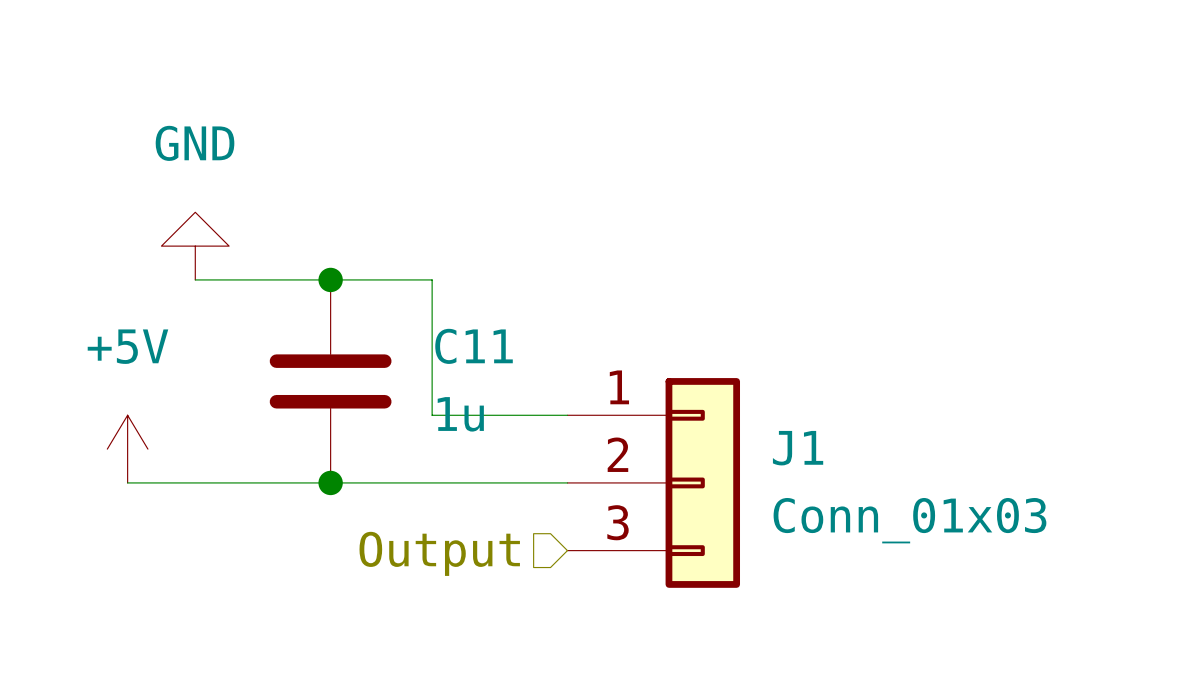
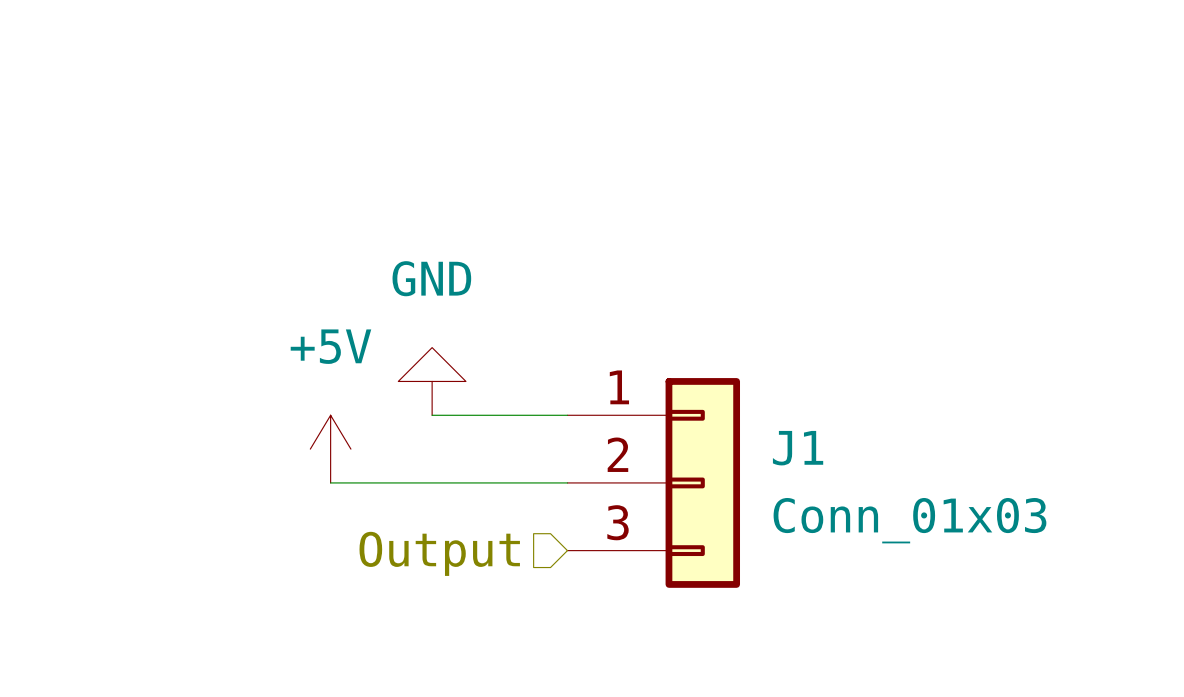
power symbol position: GND (195, 246) -> GND (432, 381)
wire: (195, 279) (432, 279) (432, 415) -> none
junction: (330, 279) -> none
C11: 1u (330, 381) -> none
power symbol position: +5V (127, 449) -> +5V (330, 449)
wire: (127, 482) (330, 482) -> none
junction: (330, 482) -> none

